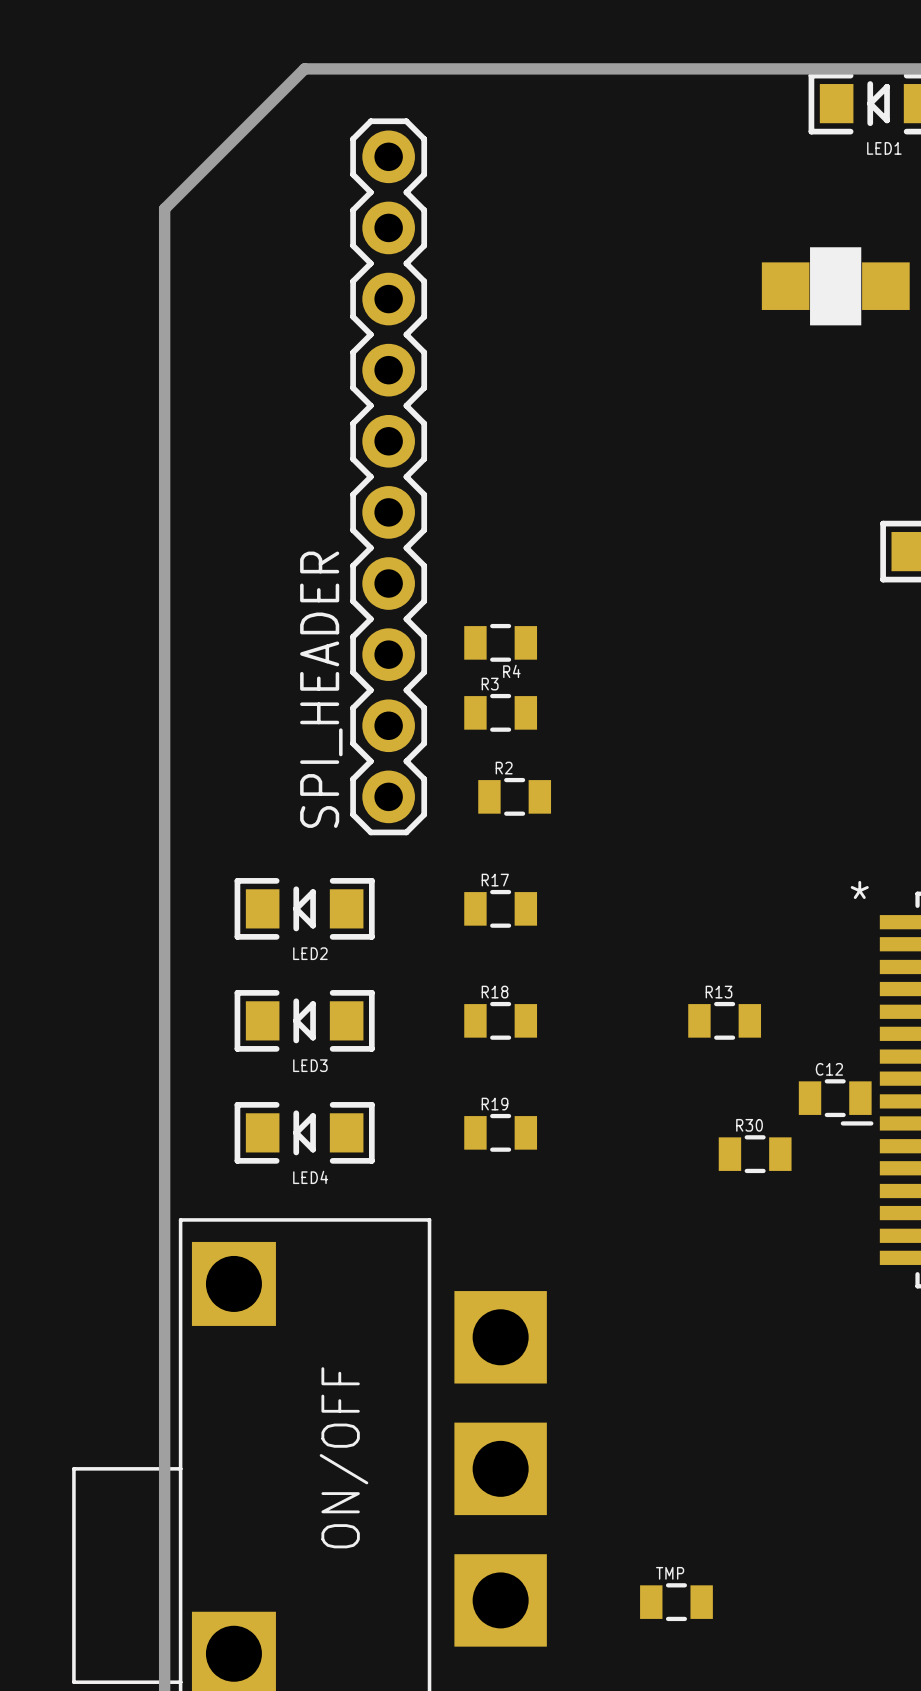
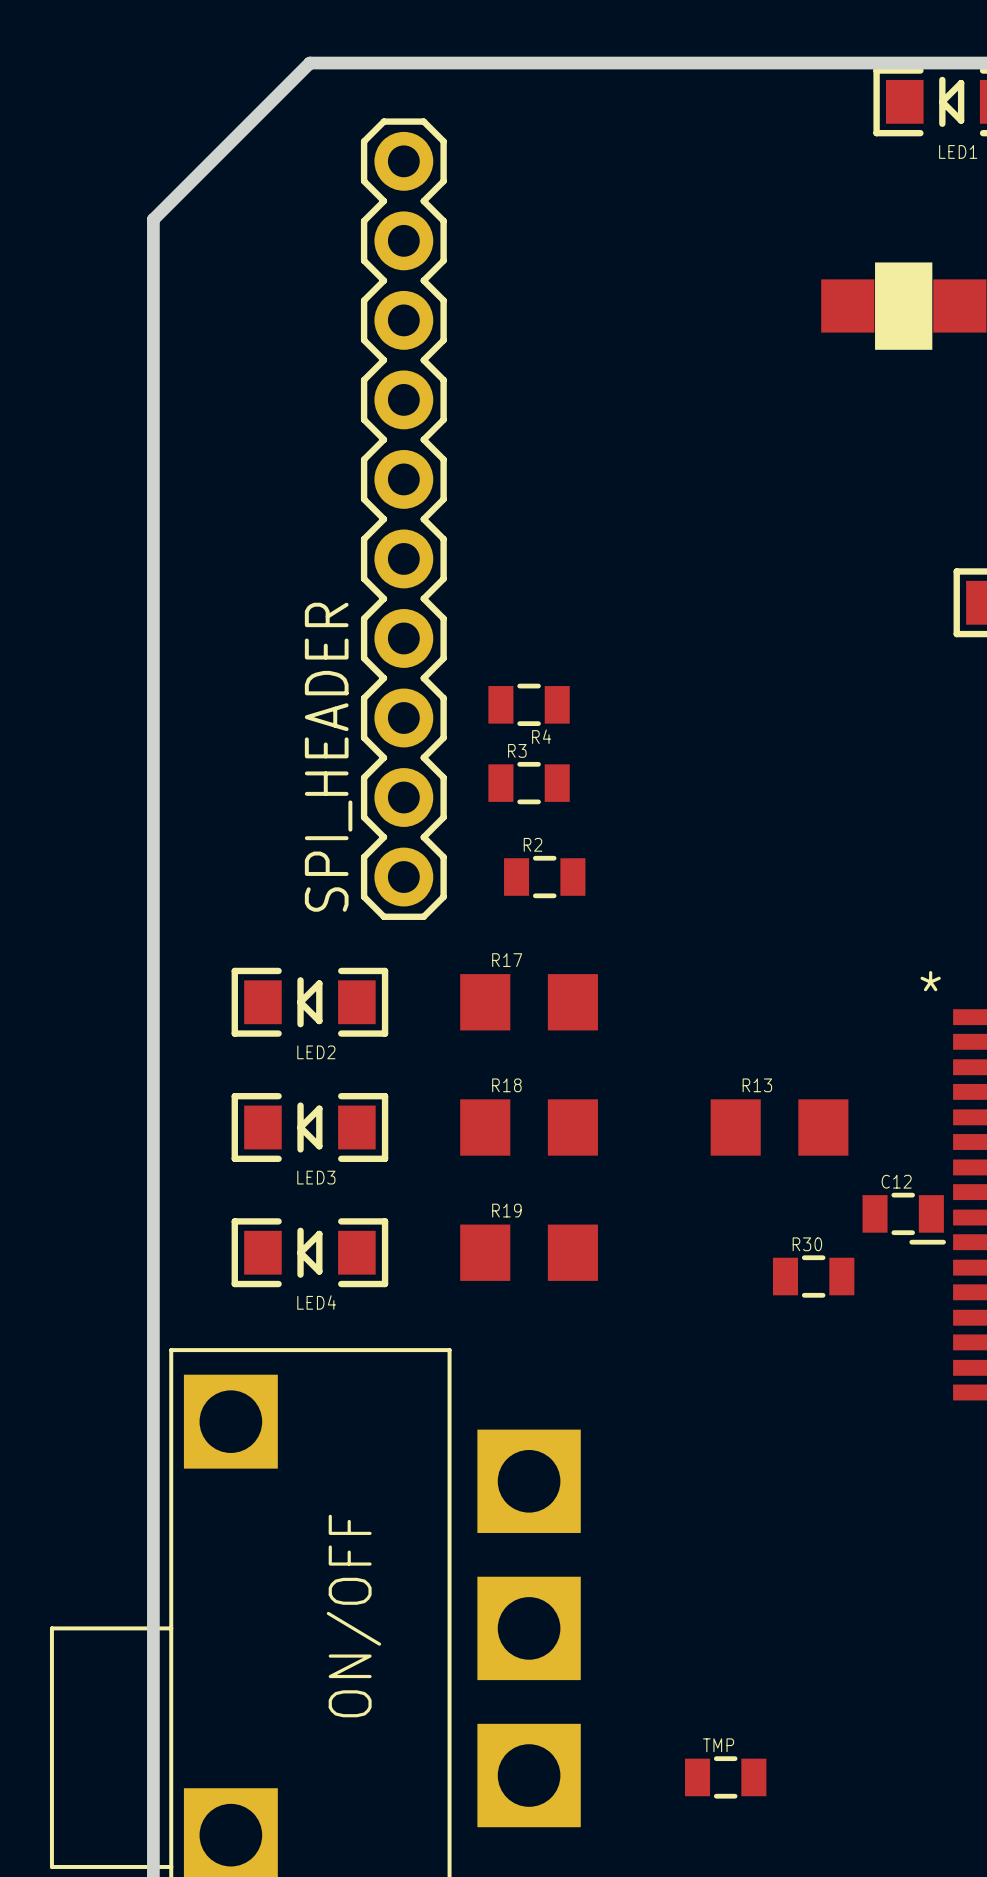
R17 footprint: [464, 889, 538, 928] -> [460, 974, 598, 1031]
R18 footprint: [464, 1001, 538, 1040] -> [460, 1099, 598, 1156]
R13 footprint: [688, 1001, 762, 1040] -> [710, 1099, 849, 1156]
R19 footprint: [464, 1113, 538, 1152] -> [460, 1224, 598, 1281]

